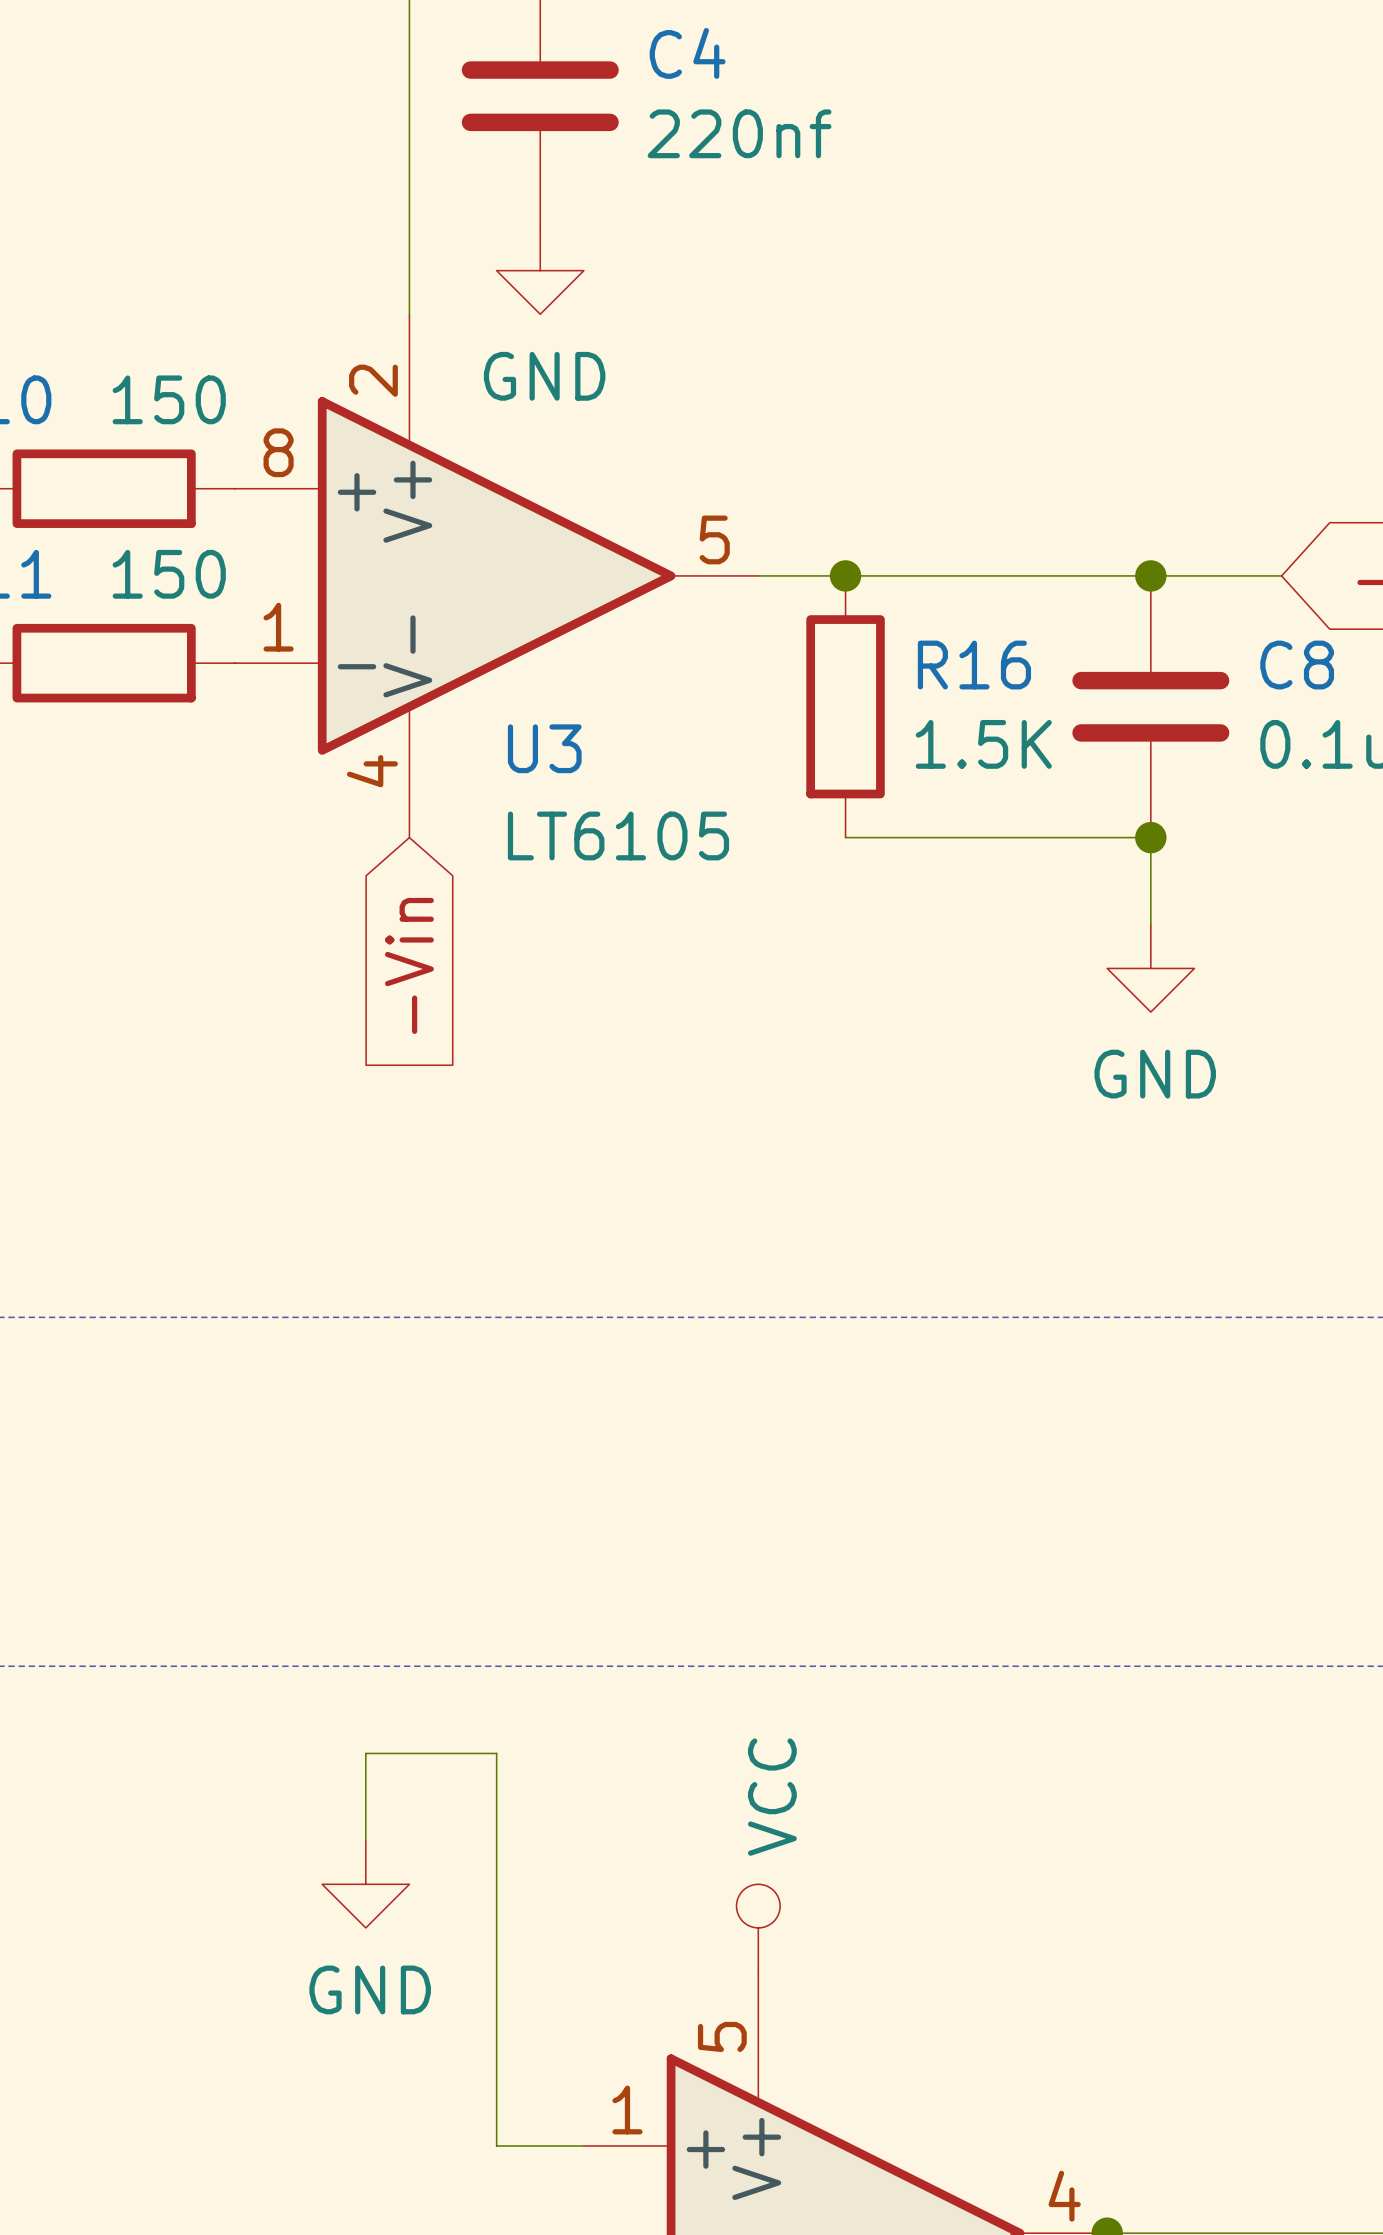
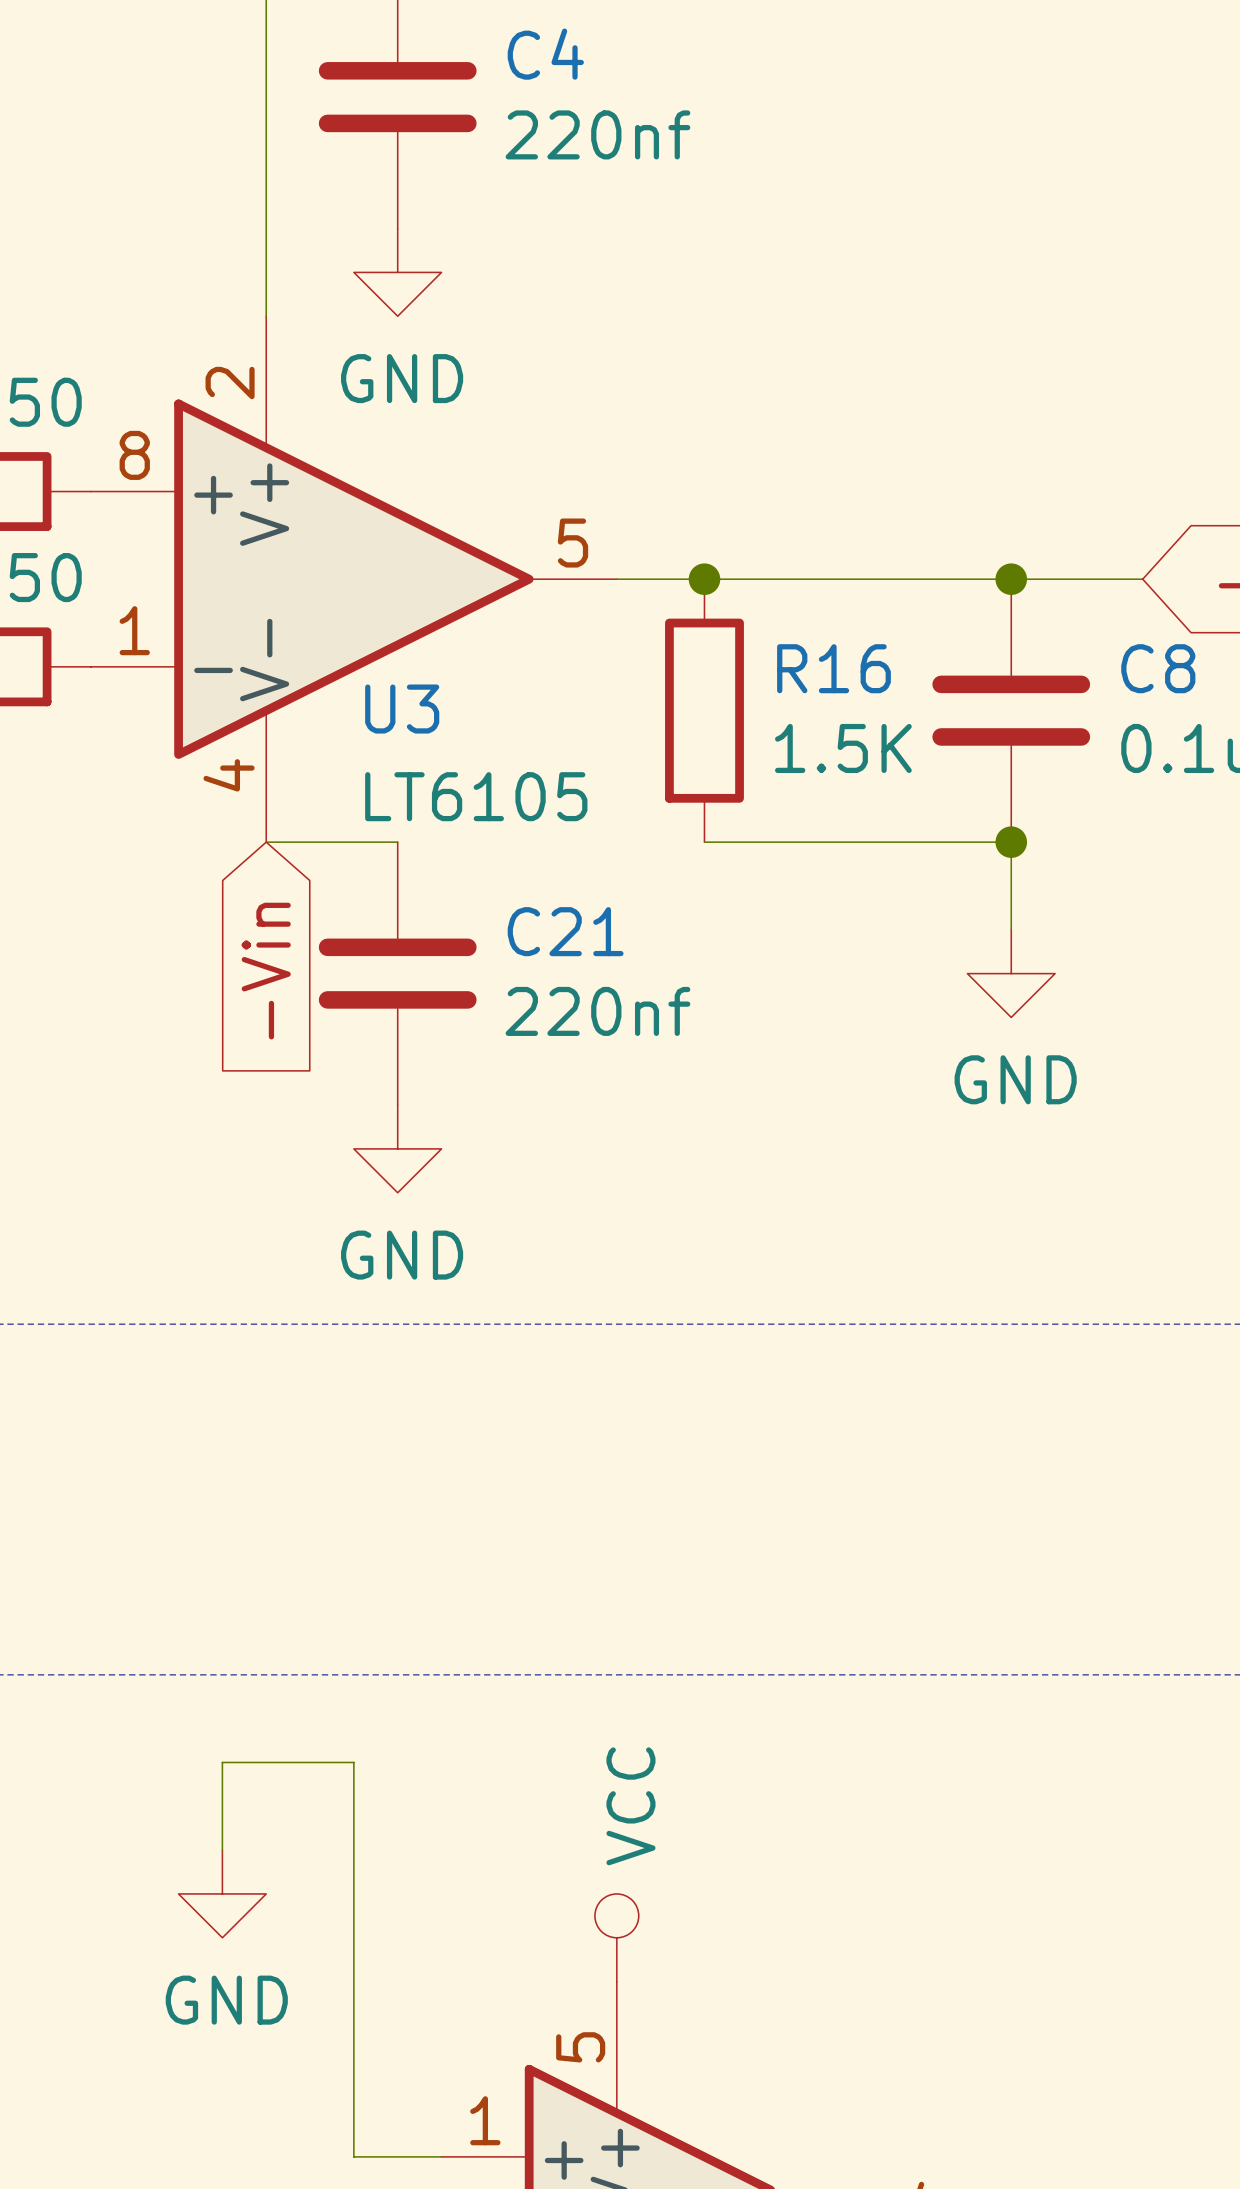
U3 name position: U3 (544, 748) -> U3 (402, 709)
U3 value position: LT6105 (618, 835) -> LT6105 (476, 796)
wire: none -> (266, 842) (397, 842)
C21: none -> 220nf (397, 973)
power symbol: none -> GND (397, 1148)

